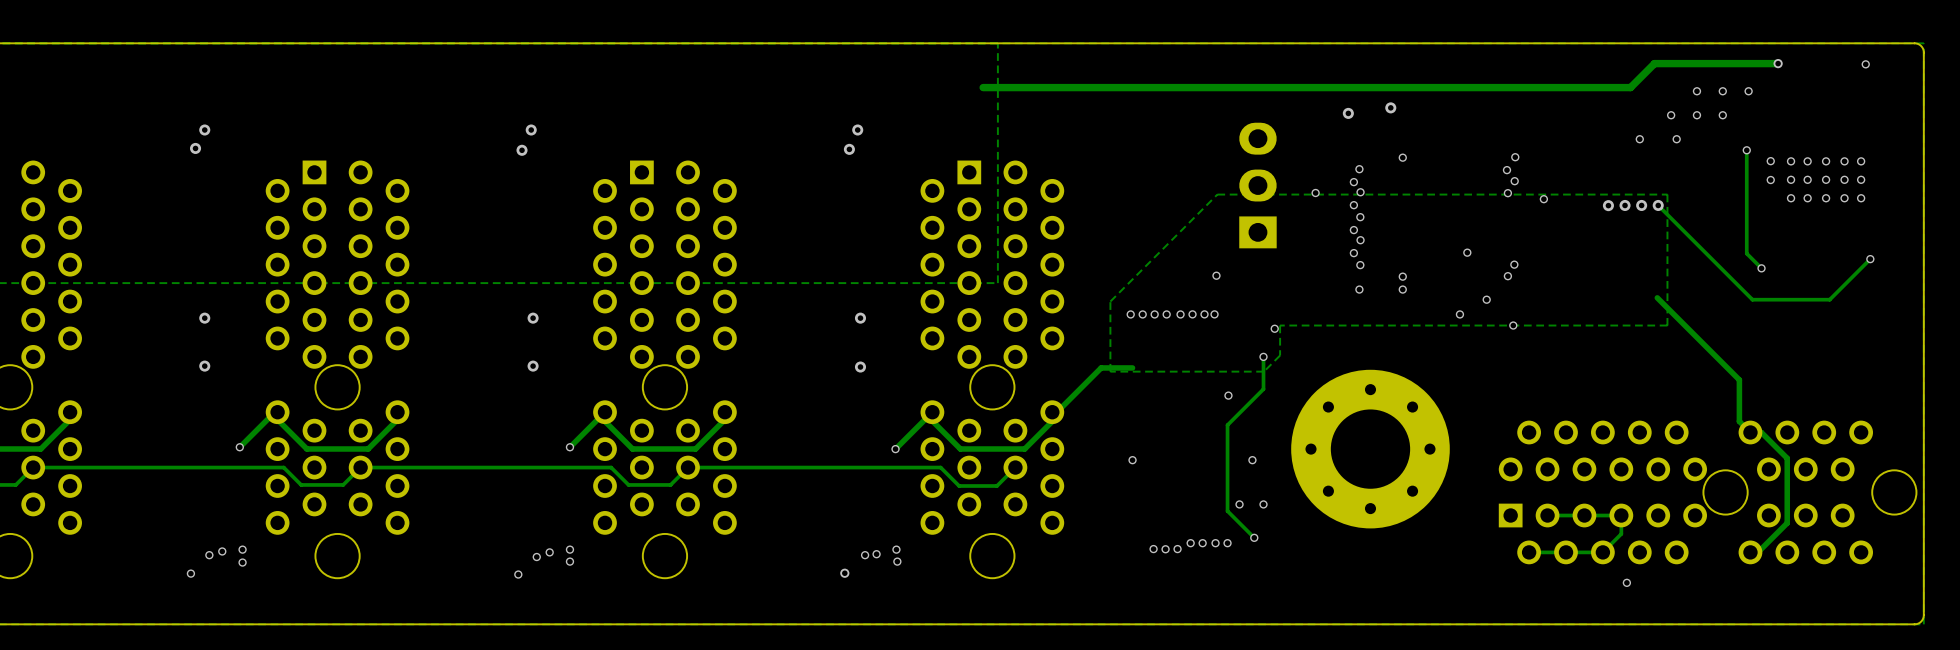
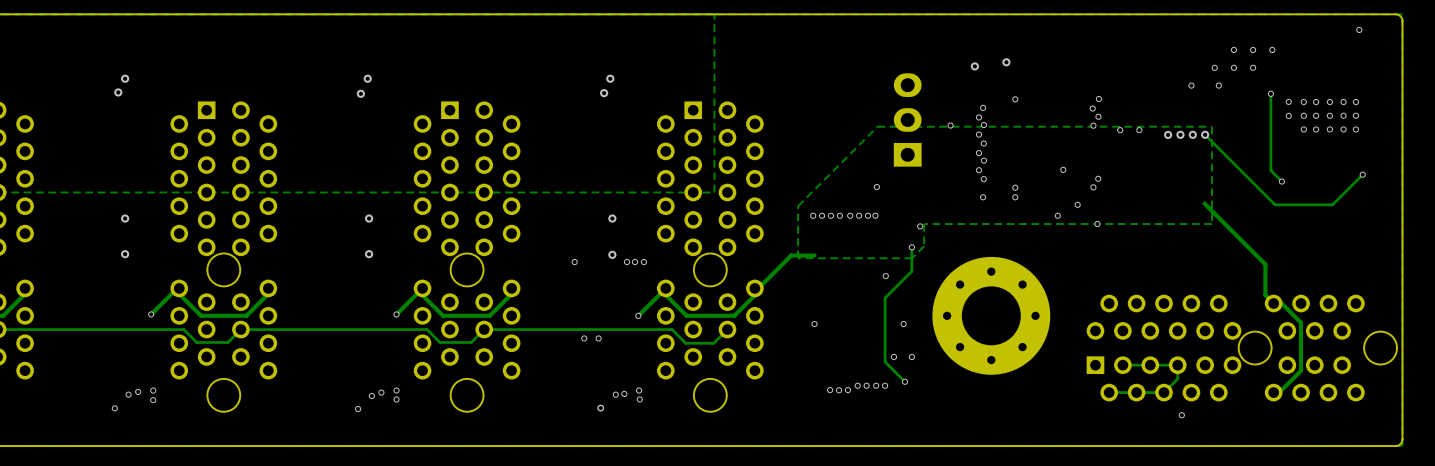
track: (1778, 63) (1654, 63) (1630, 87) (983, 87) -> none
via: (1778, 63) -> none
via: none -> (1139, 130)
via: none -> (574, 262)
via: none -> (626, 262)
via: none -> (634, 262)
via: none -> (643, 262)
via: none -> (584, 338)
via: none -> (598, 338)

